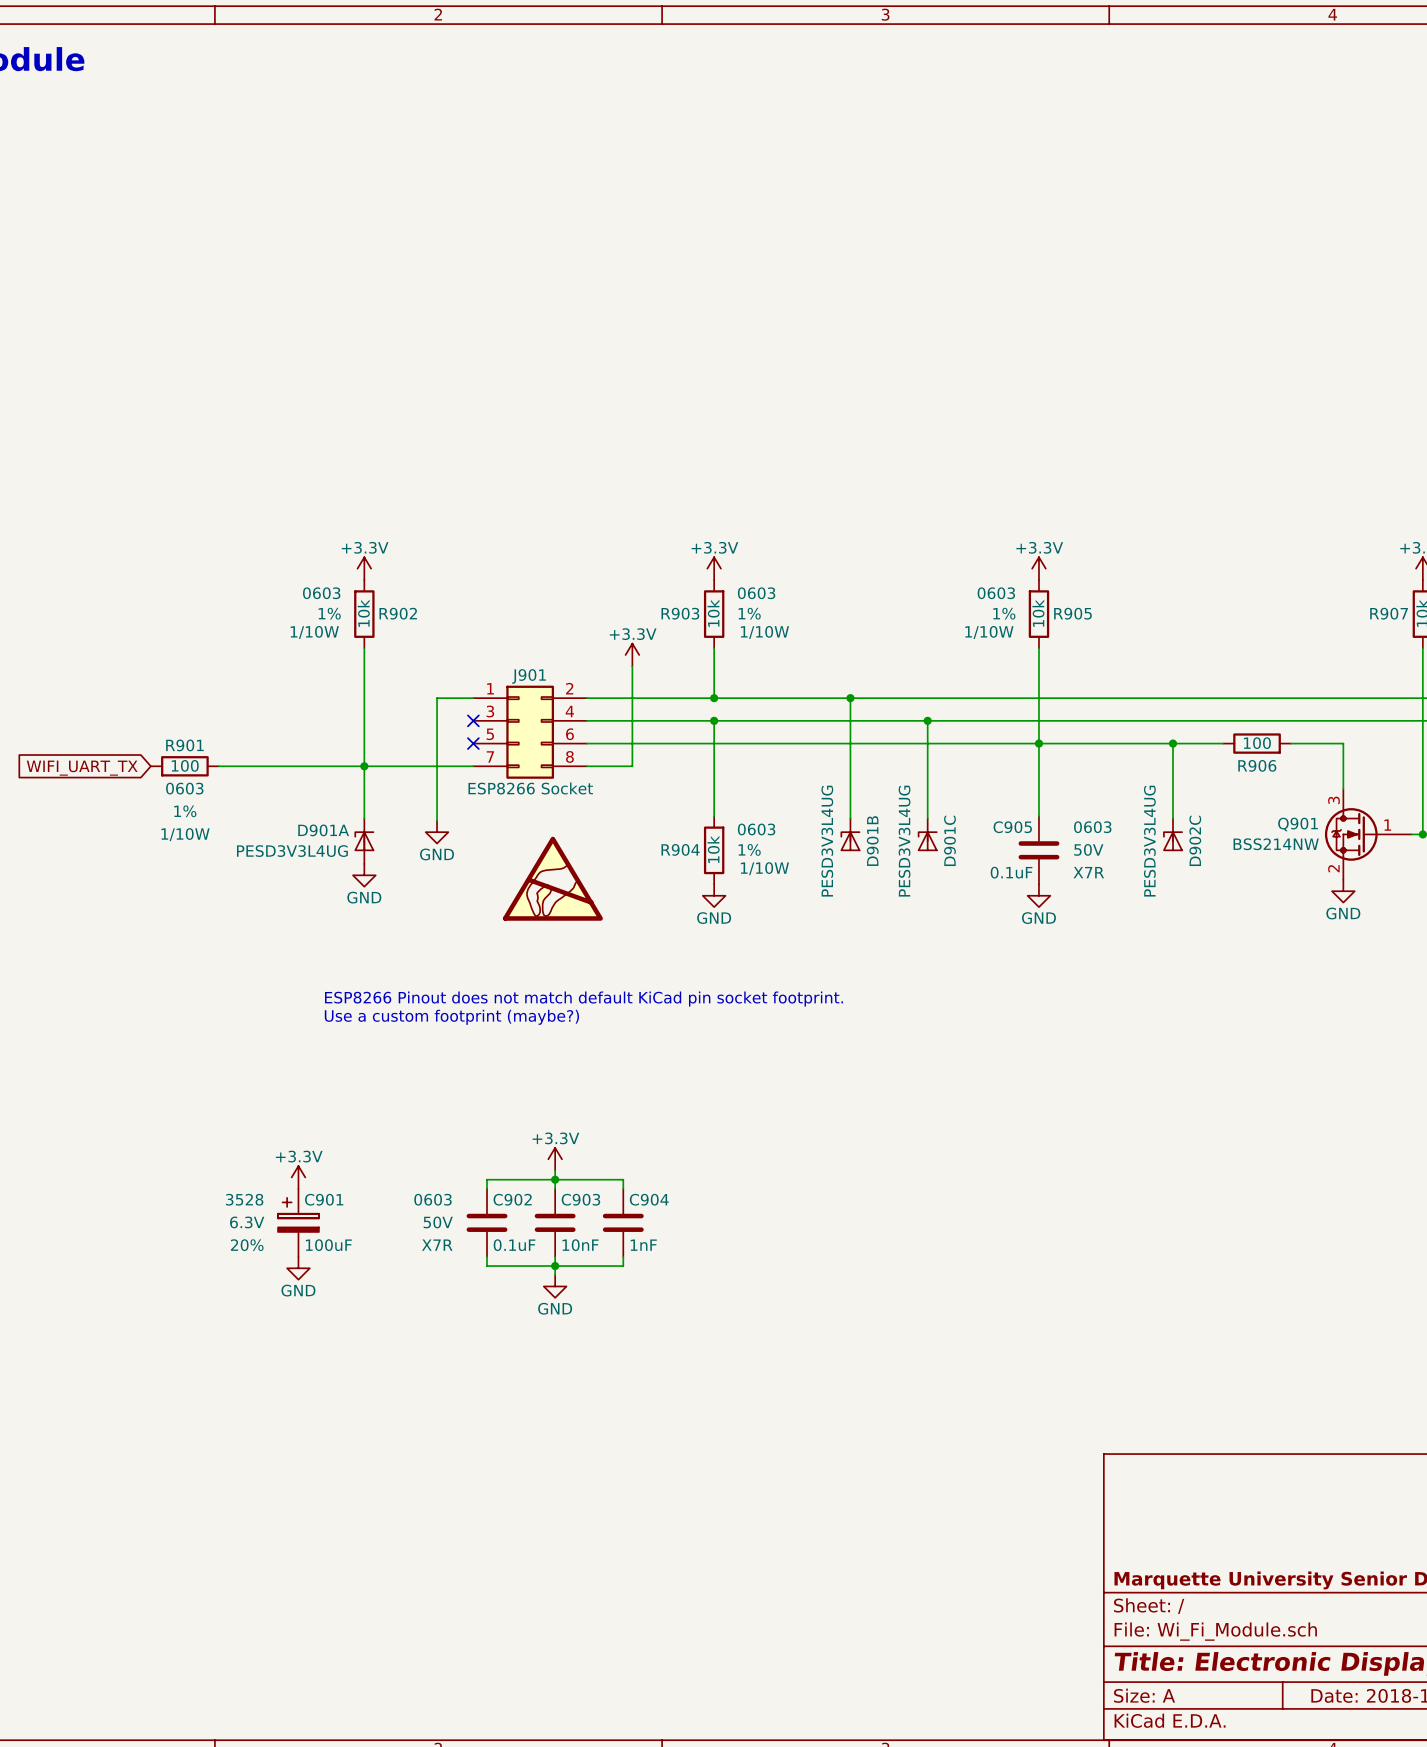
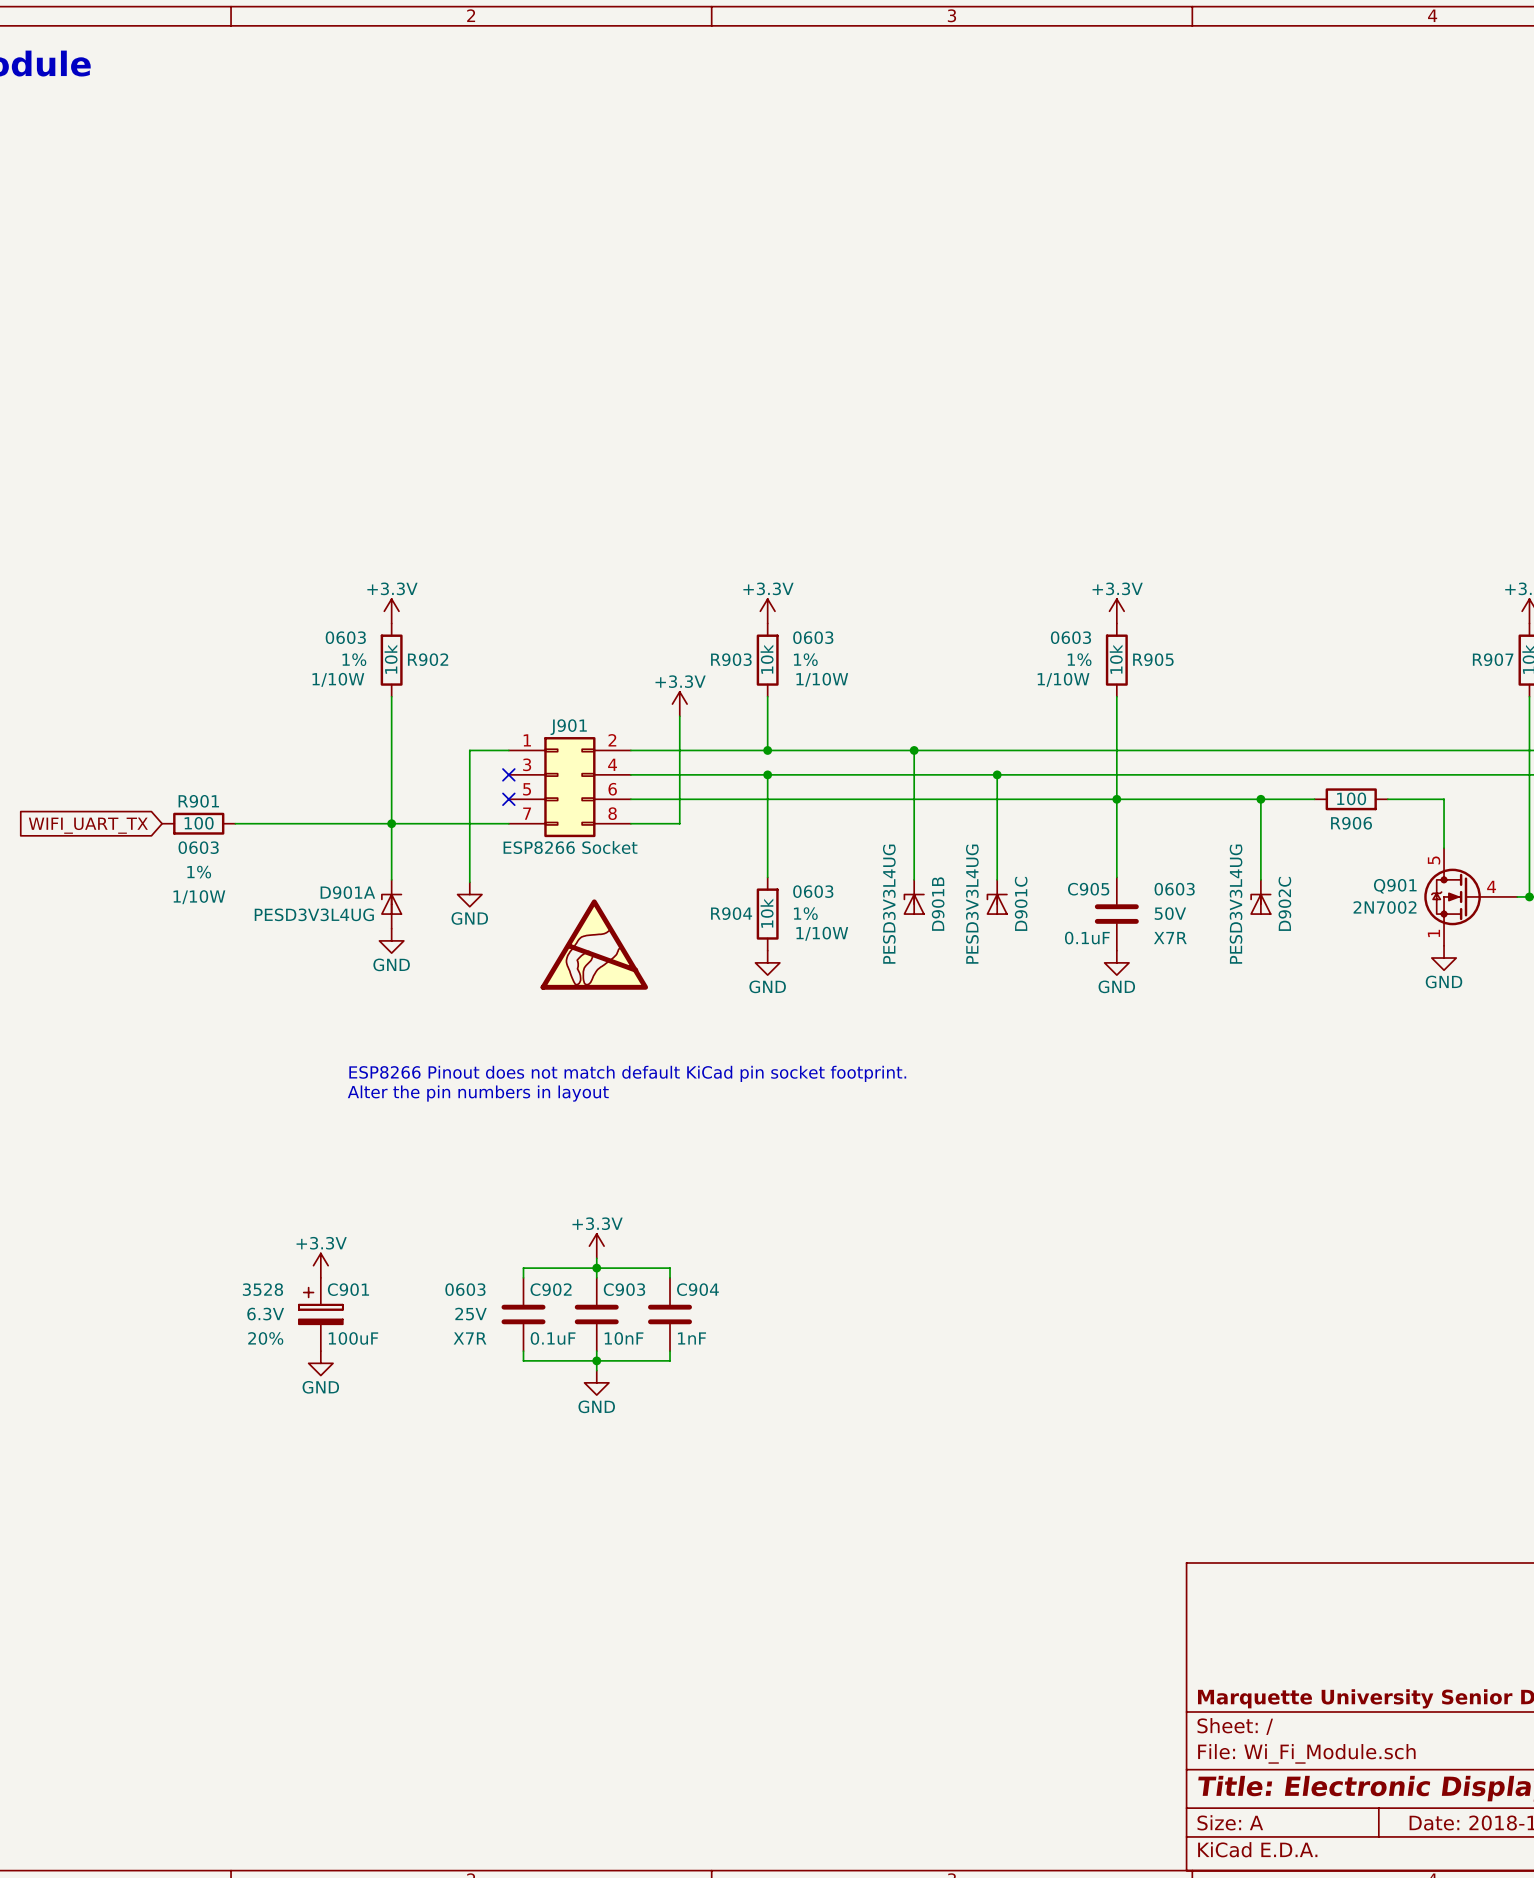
Q901 pin number: 3 (1334, 800) -> 5 (1434, 860)
Q901 pin number: 1 (1387, 825) -> 4 (1491, 886)
Q901 value: BSS214NW (1276, 844) -> 2N7002 (1385, 907)
Q901 pin number: 2 (1333, 868) -> 1 (1433, 933)
text: Use a custom footprint (maybe?) (451, 1017) -> Alter the pin numbers in layout (478, 1093)
C902 text: 50V (438, 1222) -> 25V (471, 1314)

